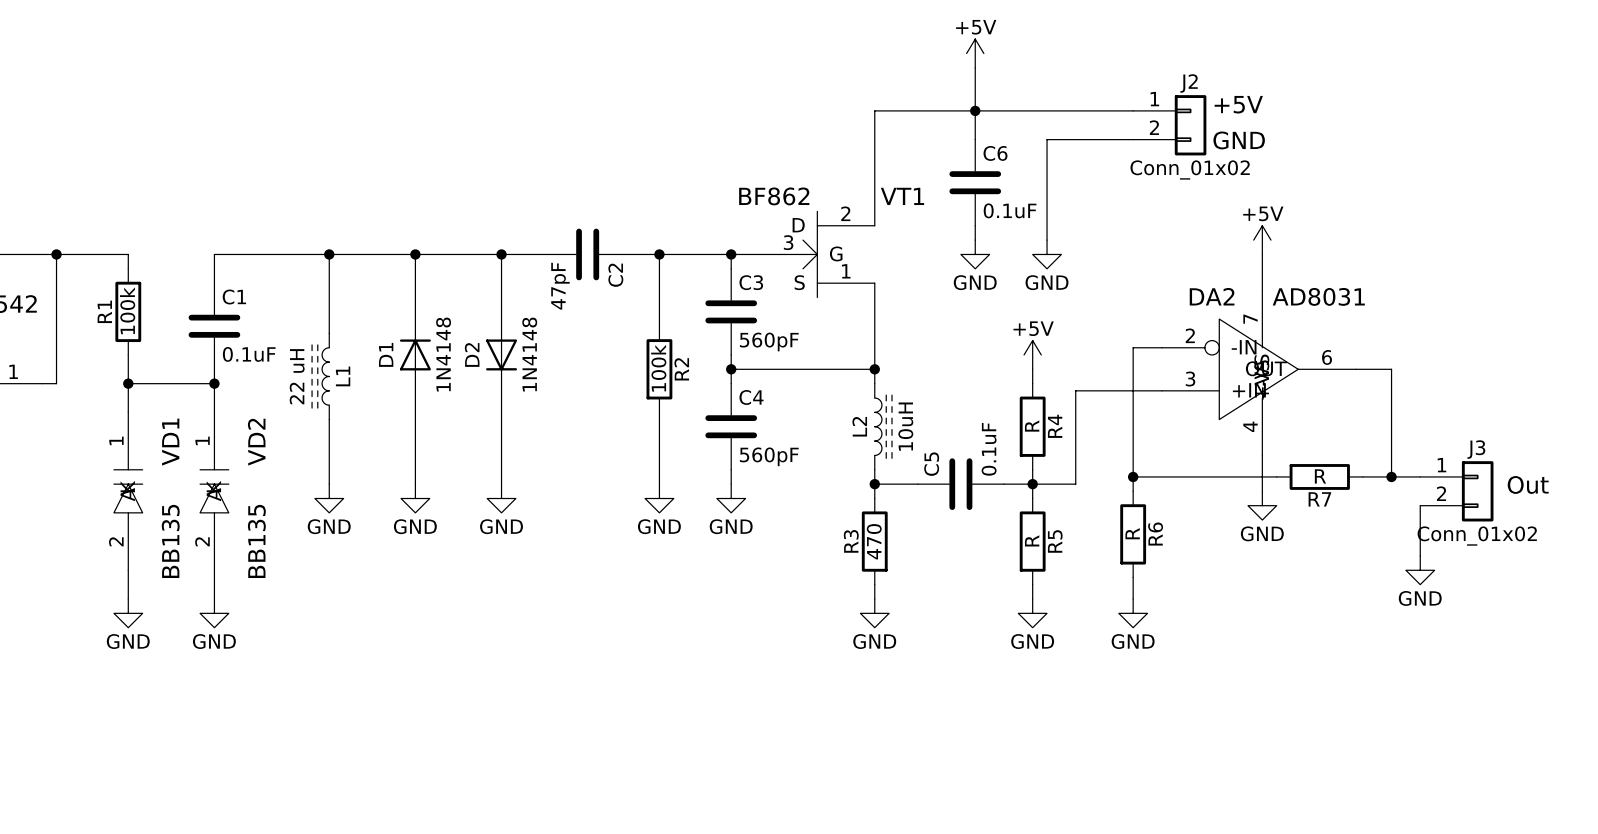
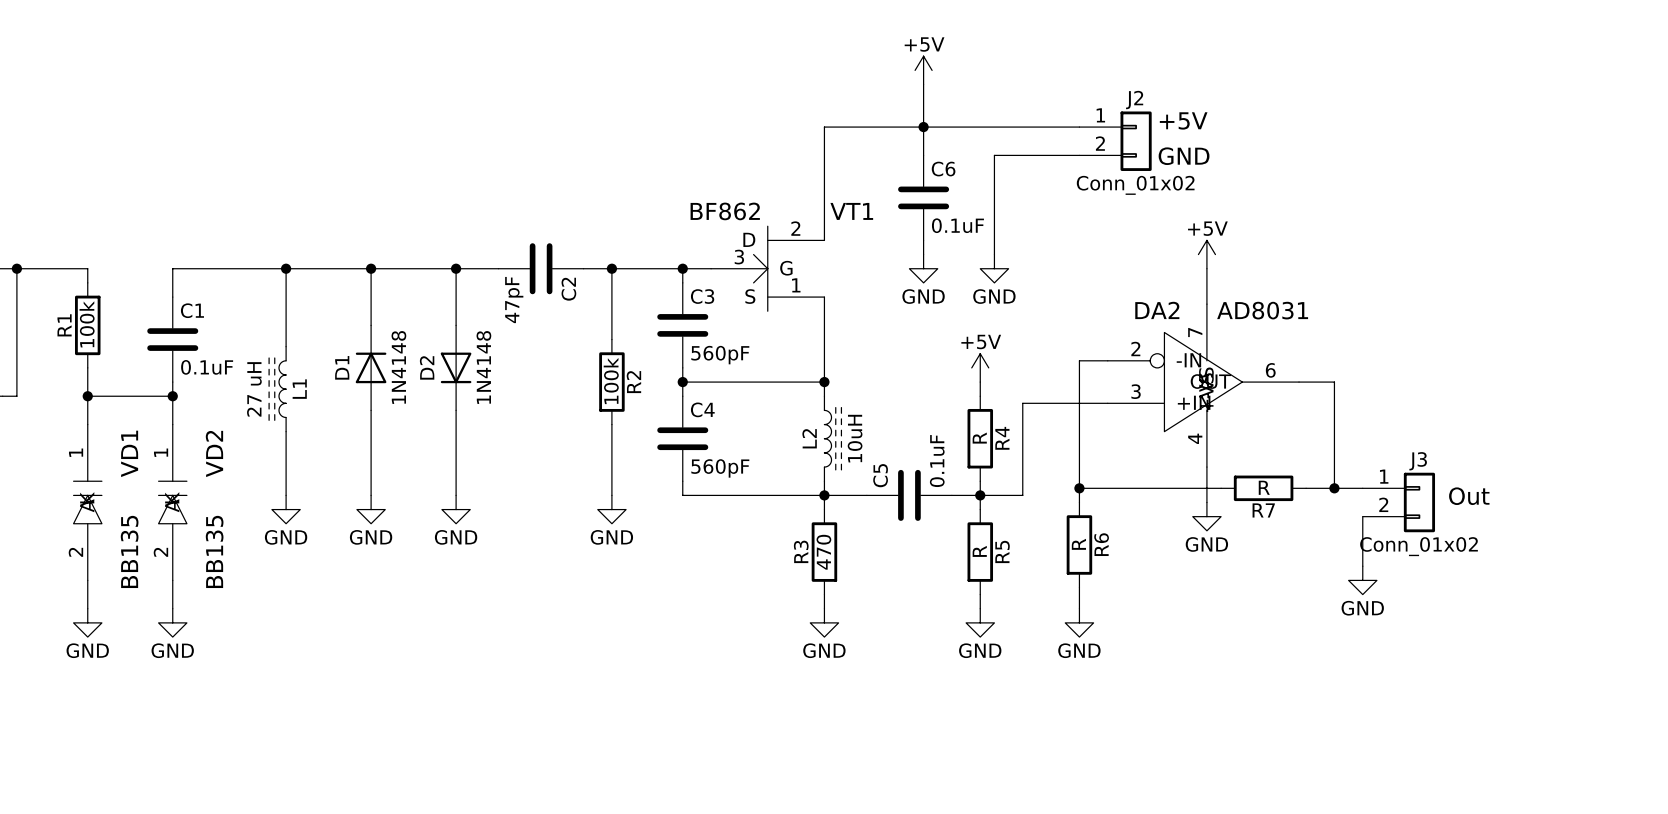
L1 value: 22 uH (297, 376) -> 27 uH (254, 389)
wire: none -> (682, 495) (824, 495)
power symbol: GND (731, 498) -> none

